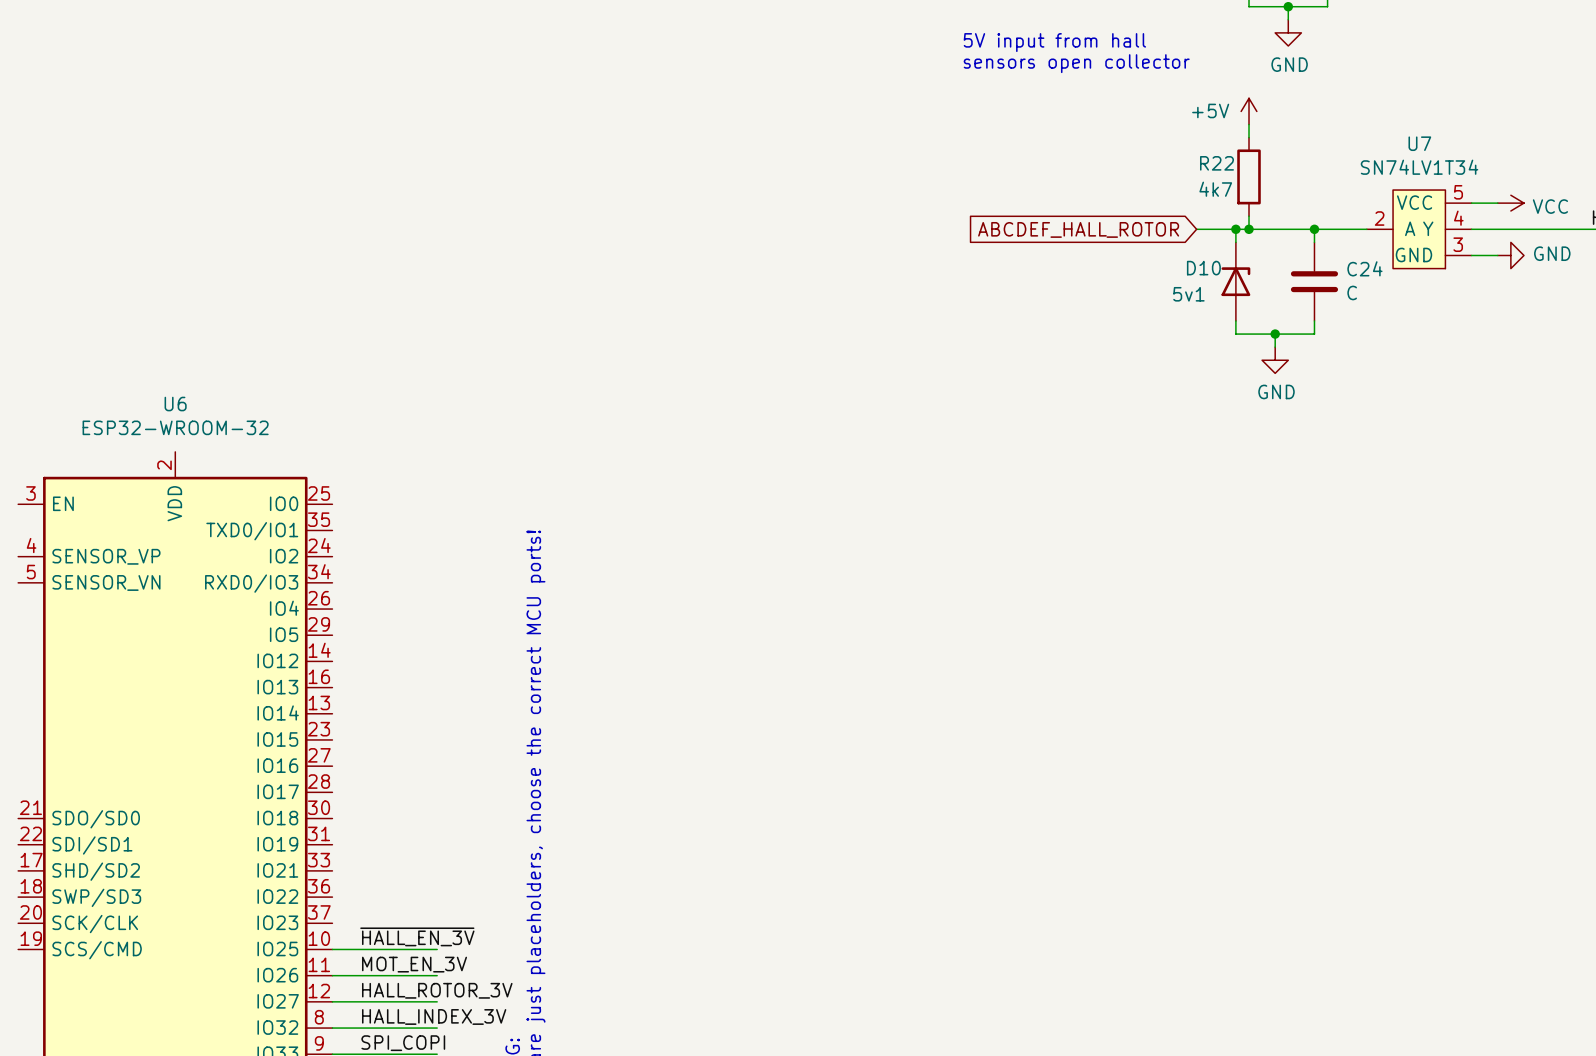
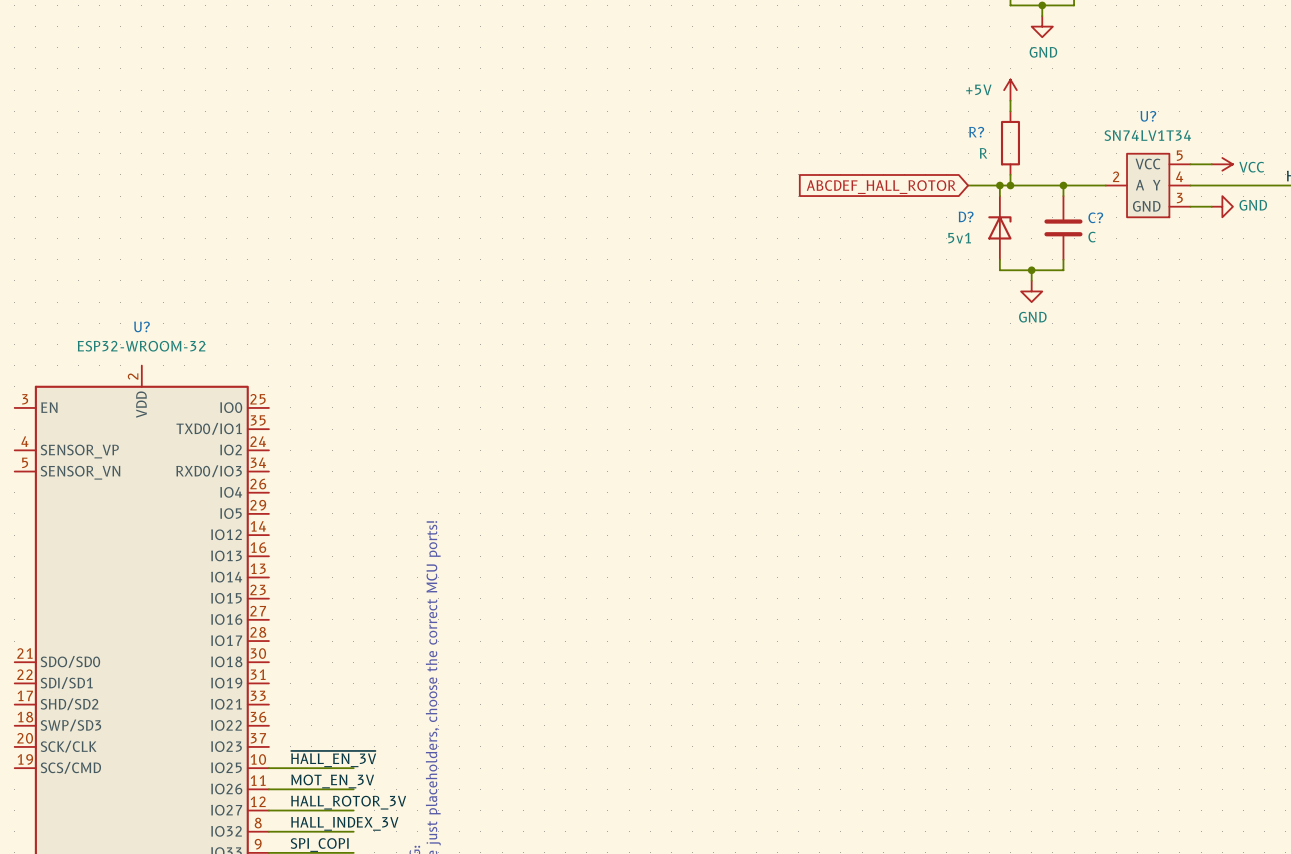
text: 5V input from hall (1054, 42) -> none
text: sensors open collector (1076, 63) -> none
U7 name: U7 (1419, 143) -> U? (1148, 116)
R22 name: R22 (1216, 163) -> R? (976, 132)
R22 value: 4k7 (1215, 189) -> R (983, 153)
D10 name: D10 (1203, 268) -> D? (966, 216)
C24 name: C24 (1364, 268) -> C? (1095, 217)
U6 name: U6 (175, 404) -> U? (142, 326)

